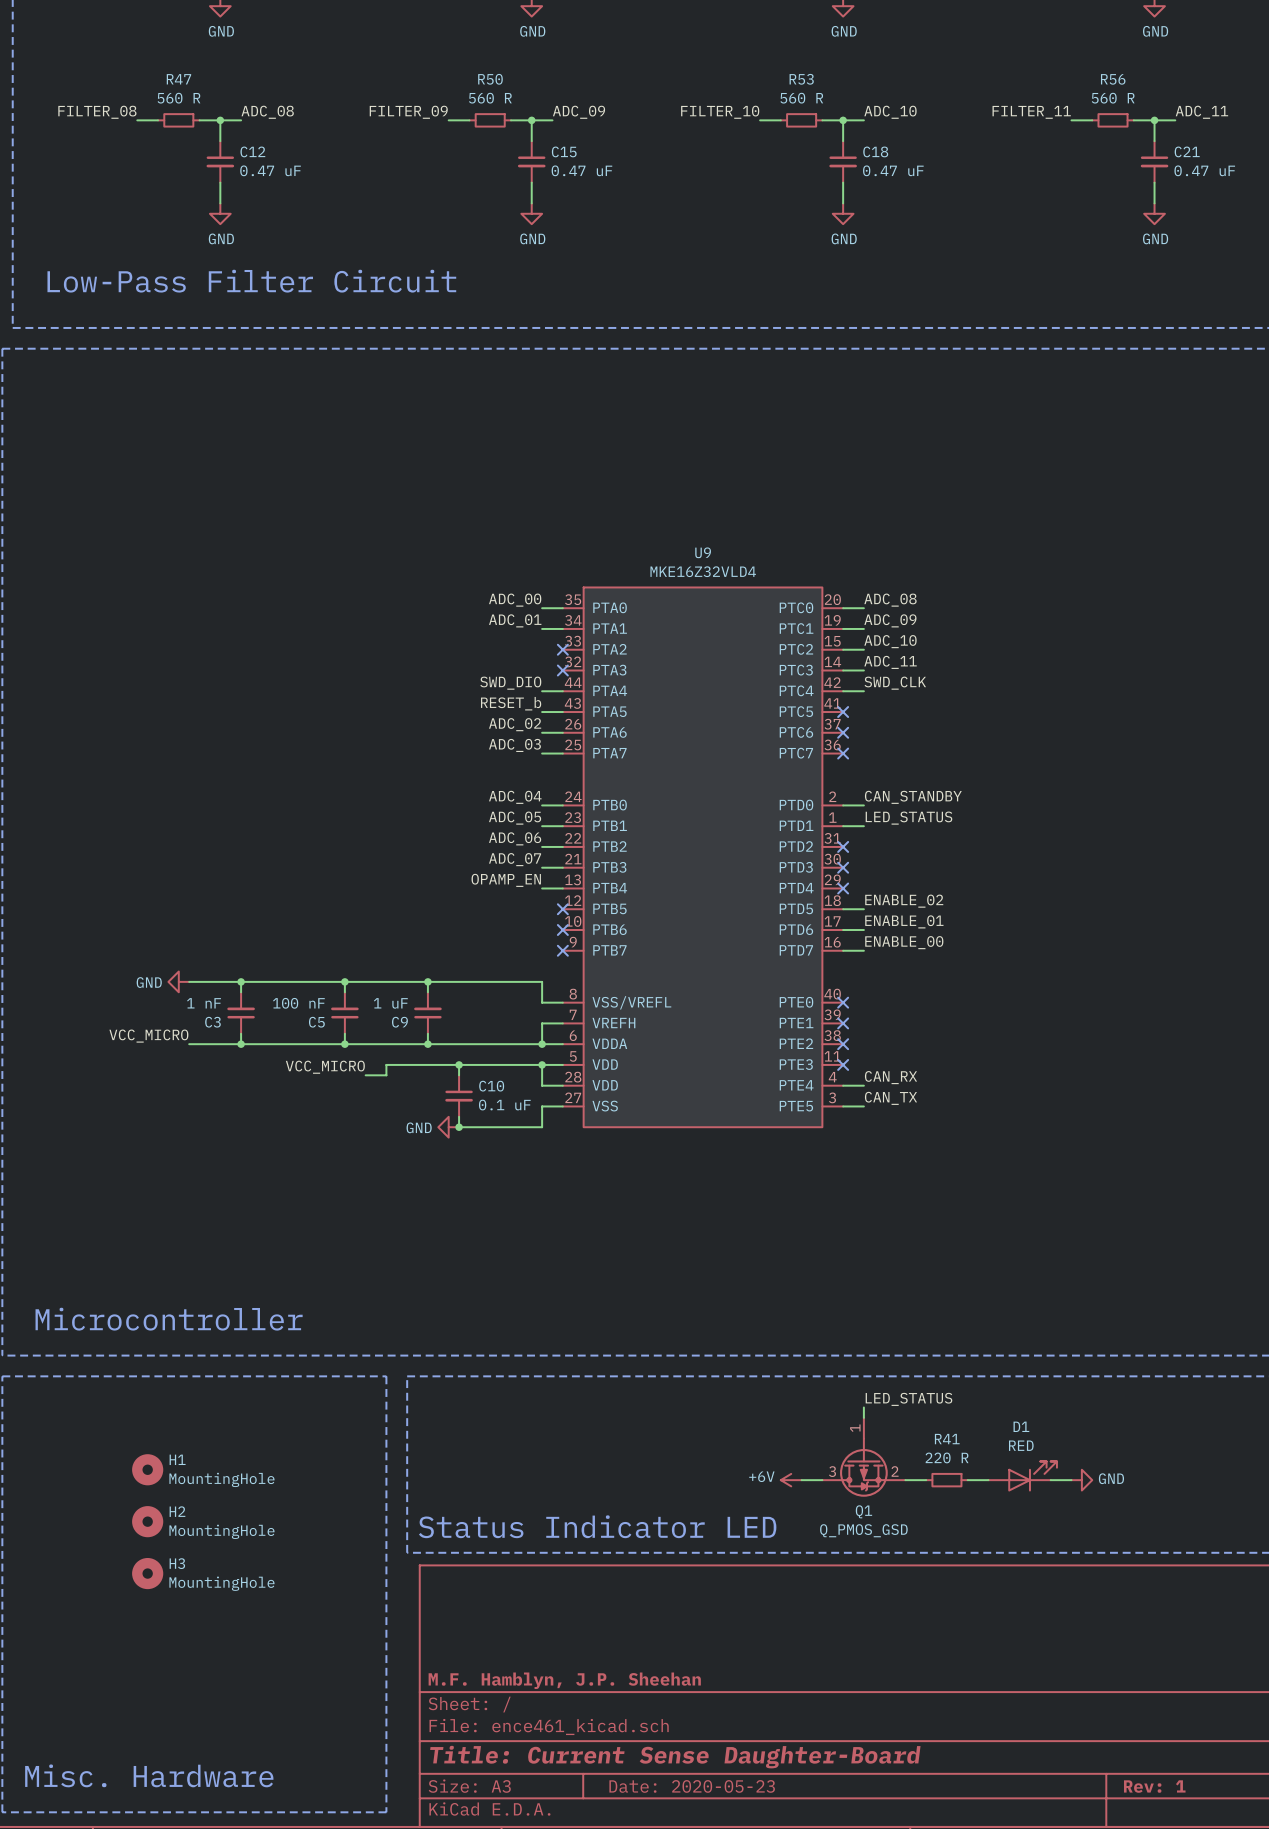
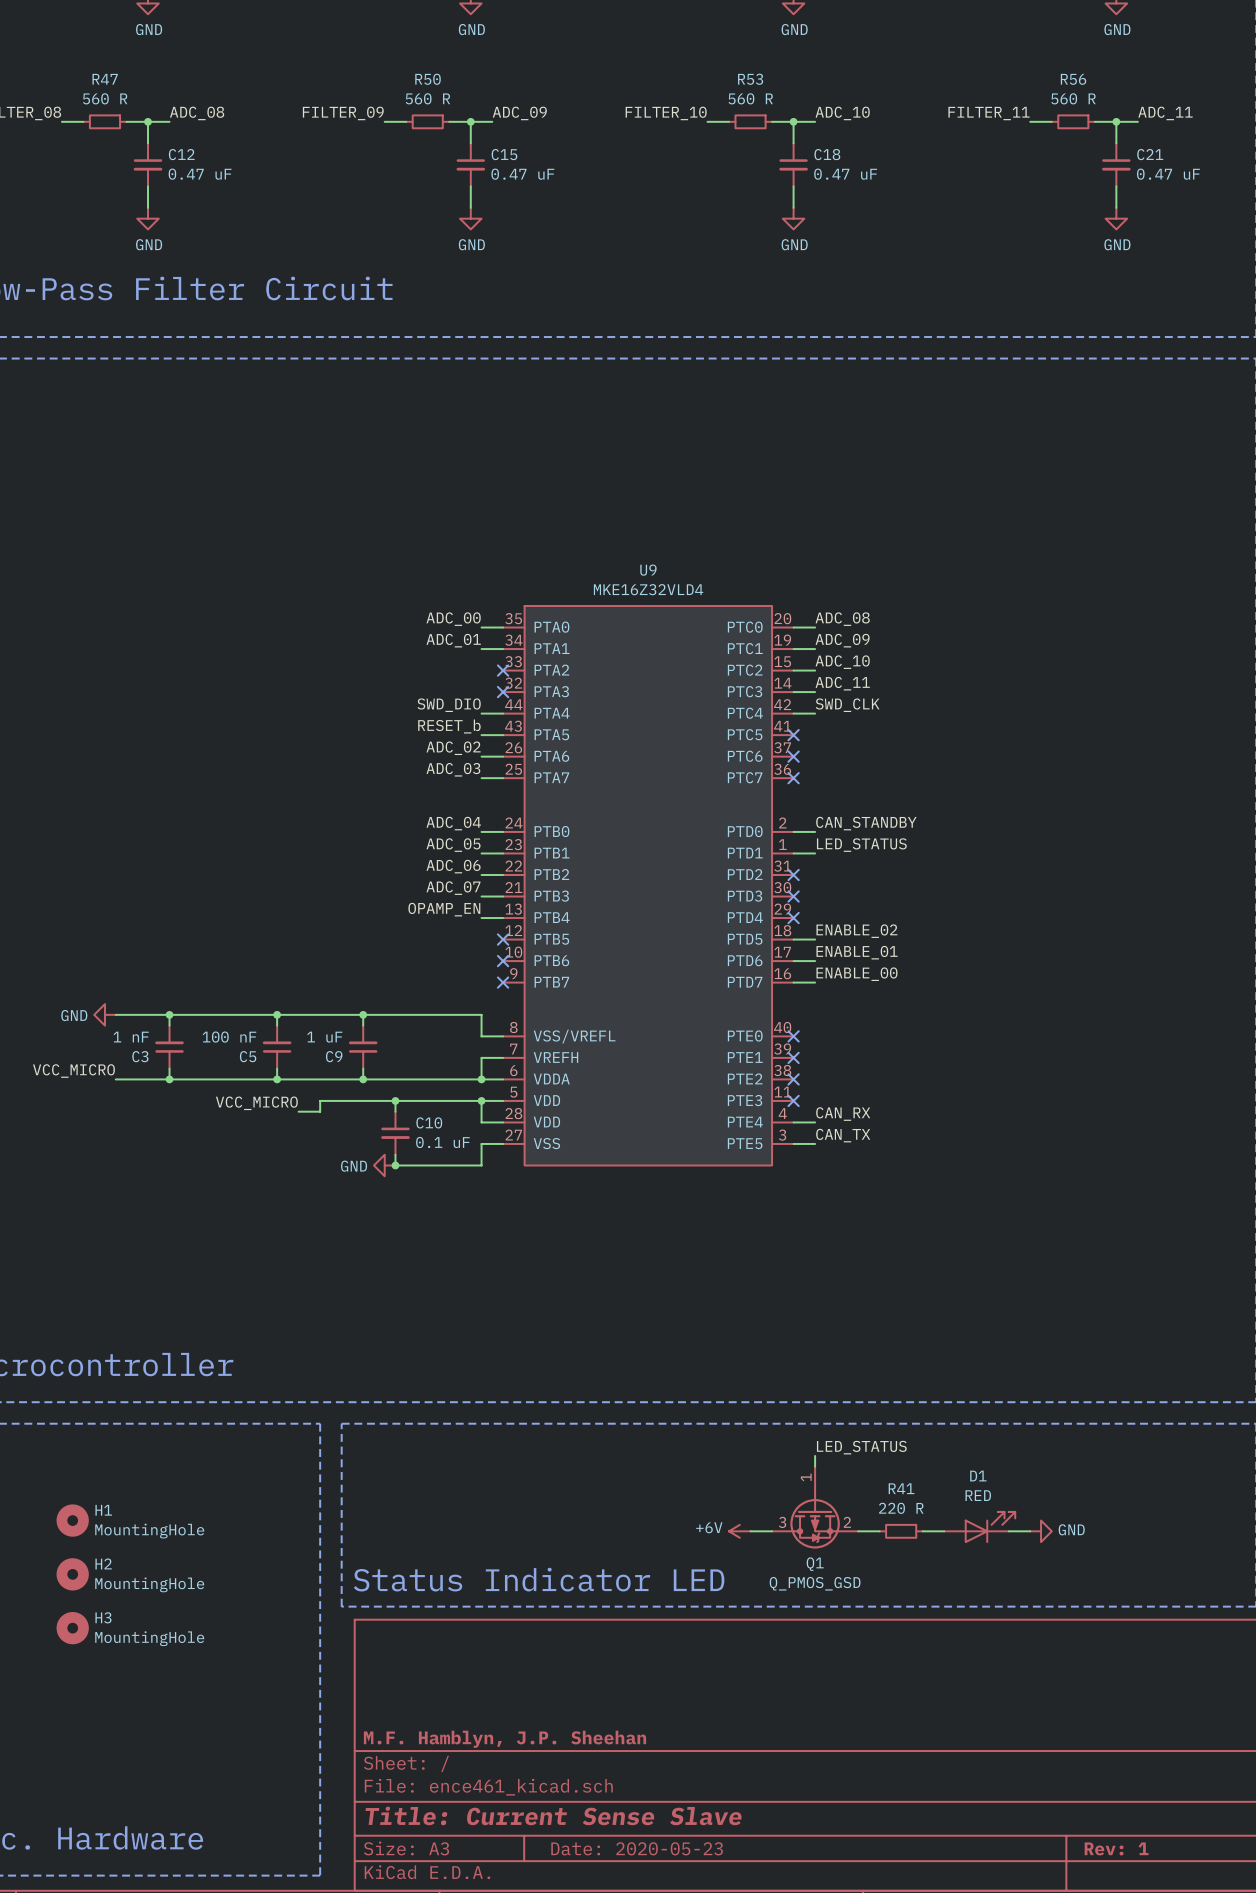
title block: Title: Current Sense Daughter-Board (675, 1757) -> Title: Current Sense Slave (553, 1815)

